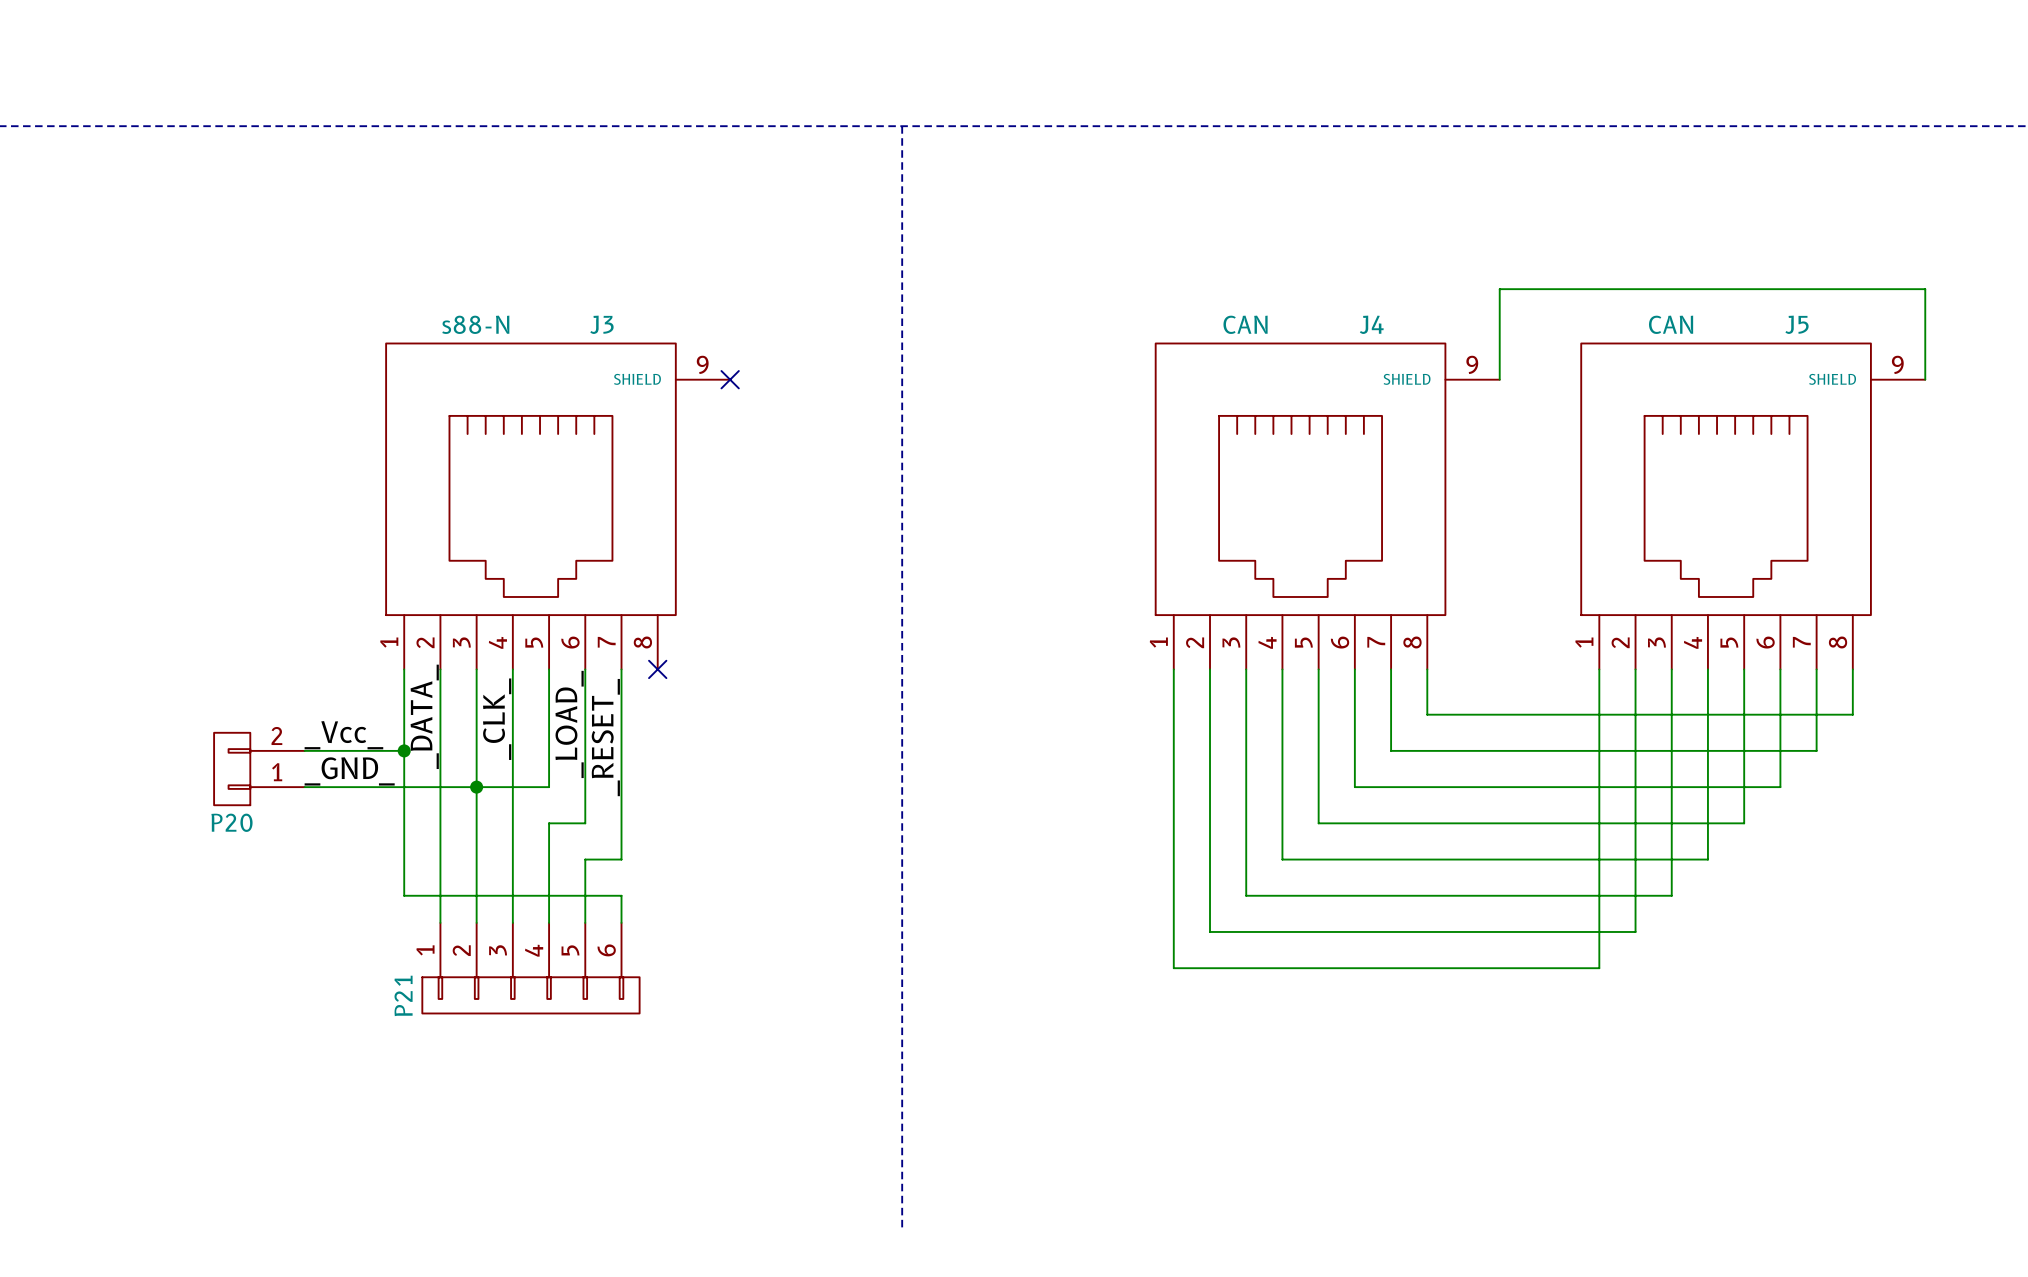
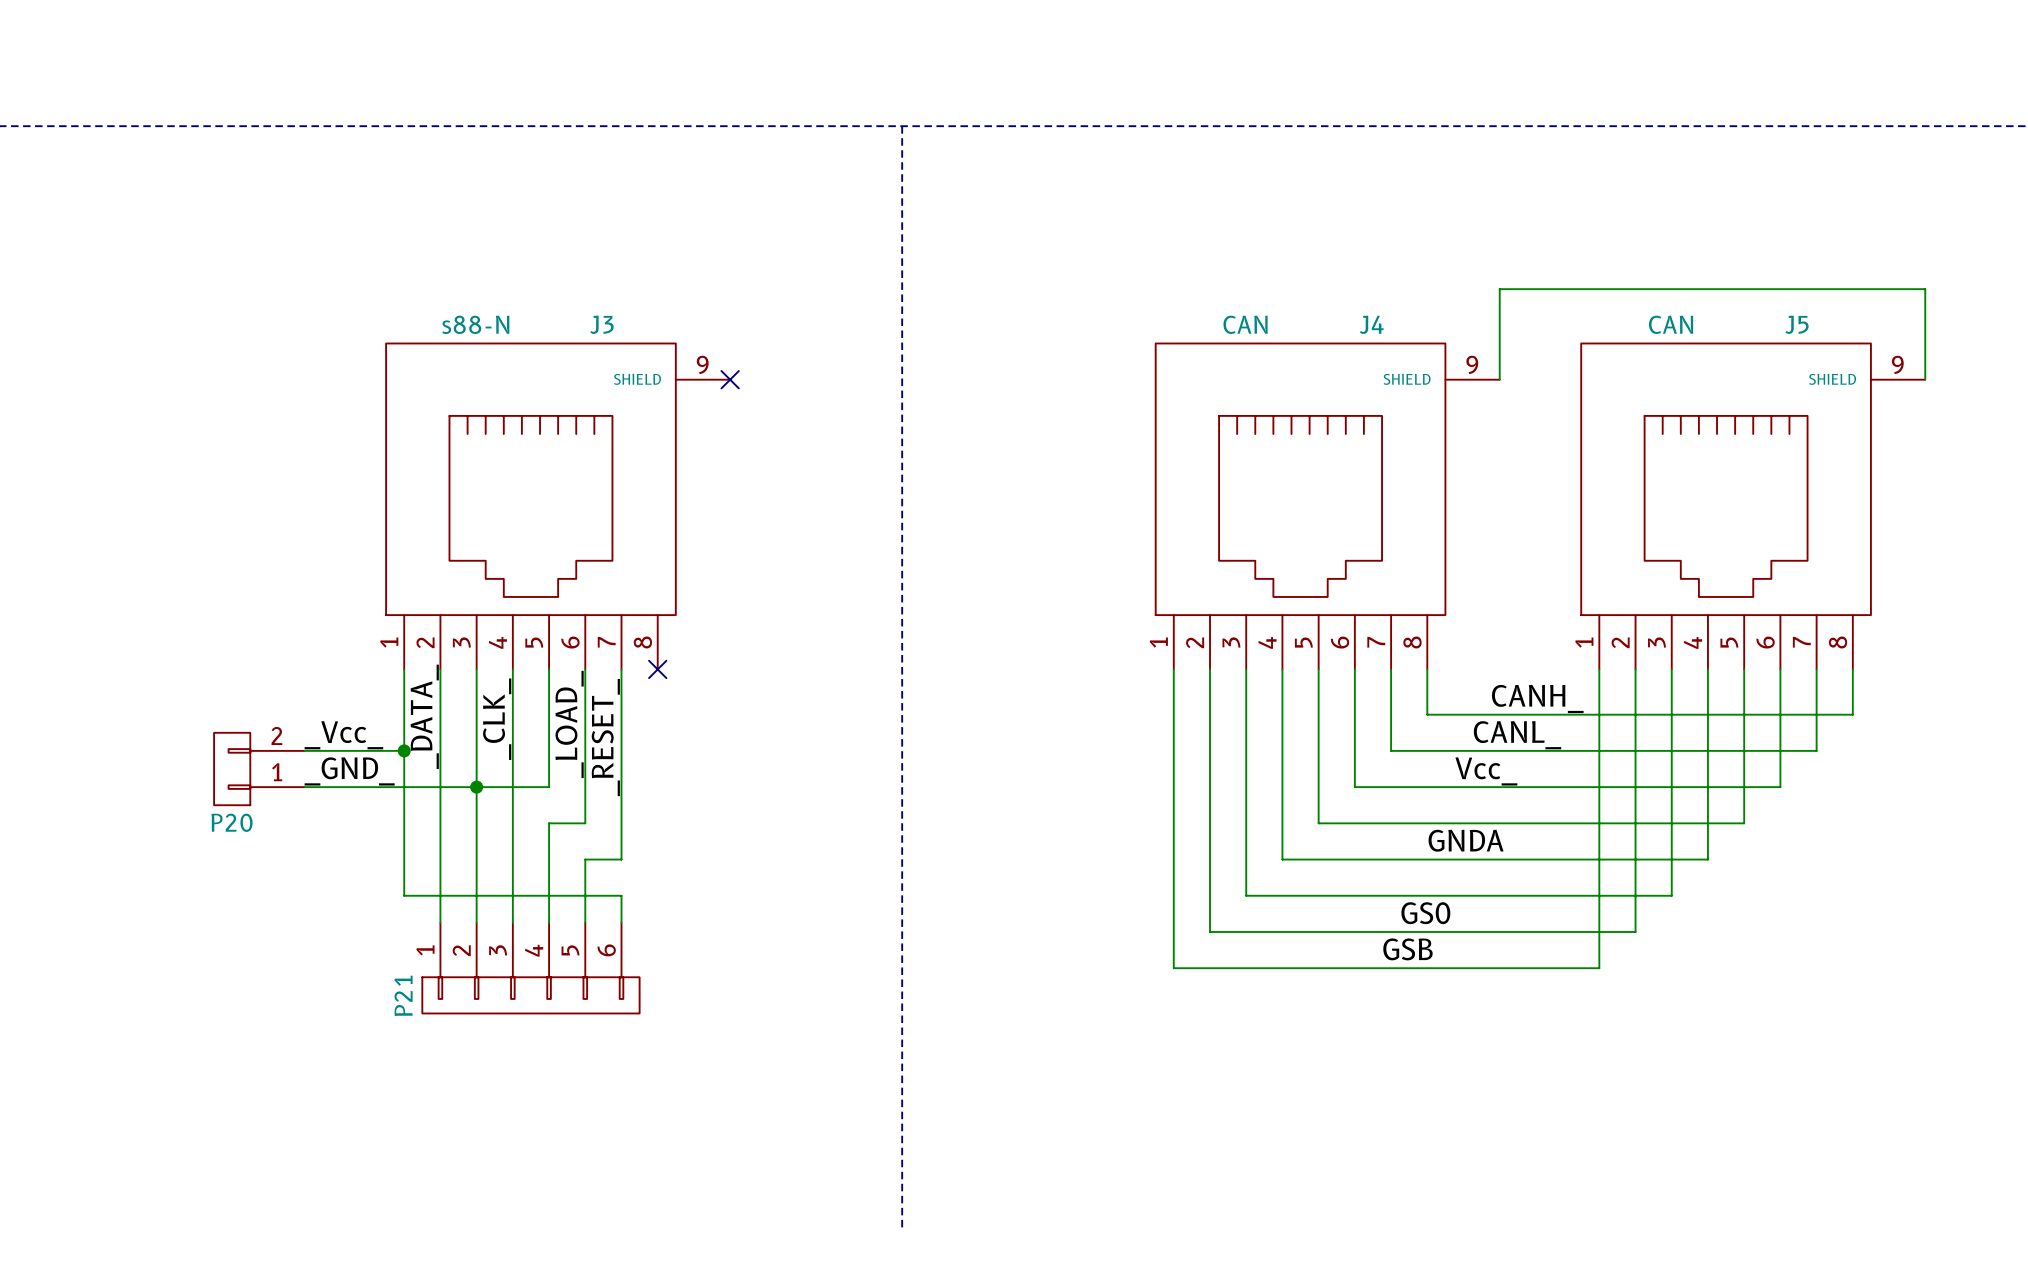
label: none -> CANH_ (1537, 698)
label: none -> CANL_ (1517, 735)
label: none -> Vcc_ (1486, 771)
label: none -> GNDA (1466, 840)
label: none -> GS0 (1425, 913)
label: none -> GSB (1407, 949)

